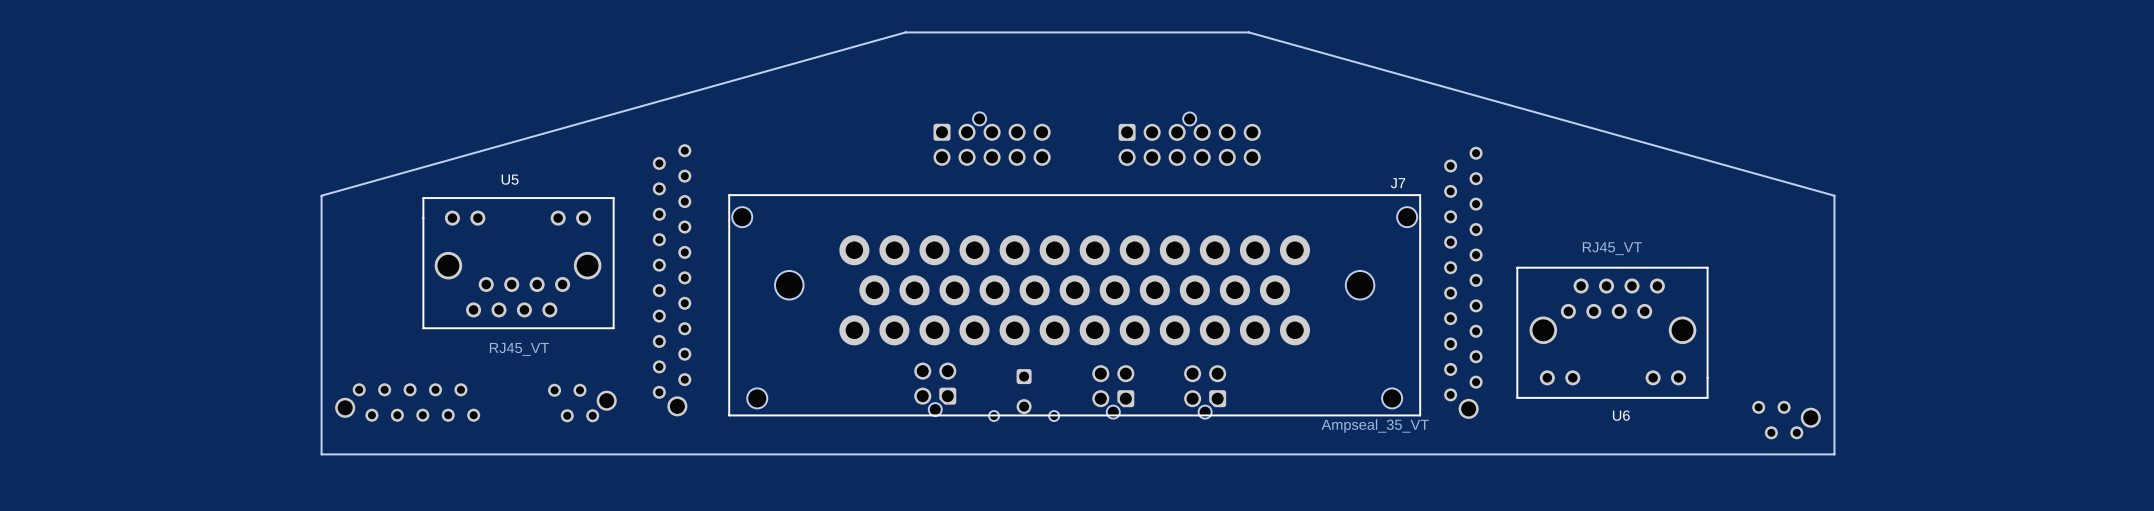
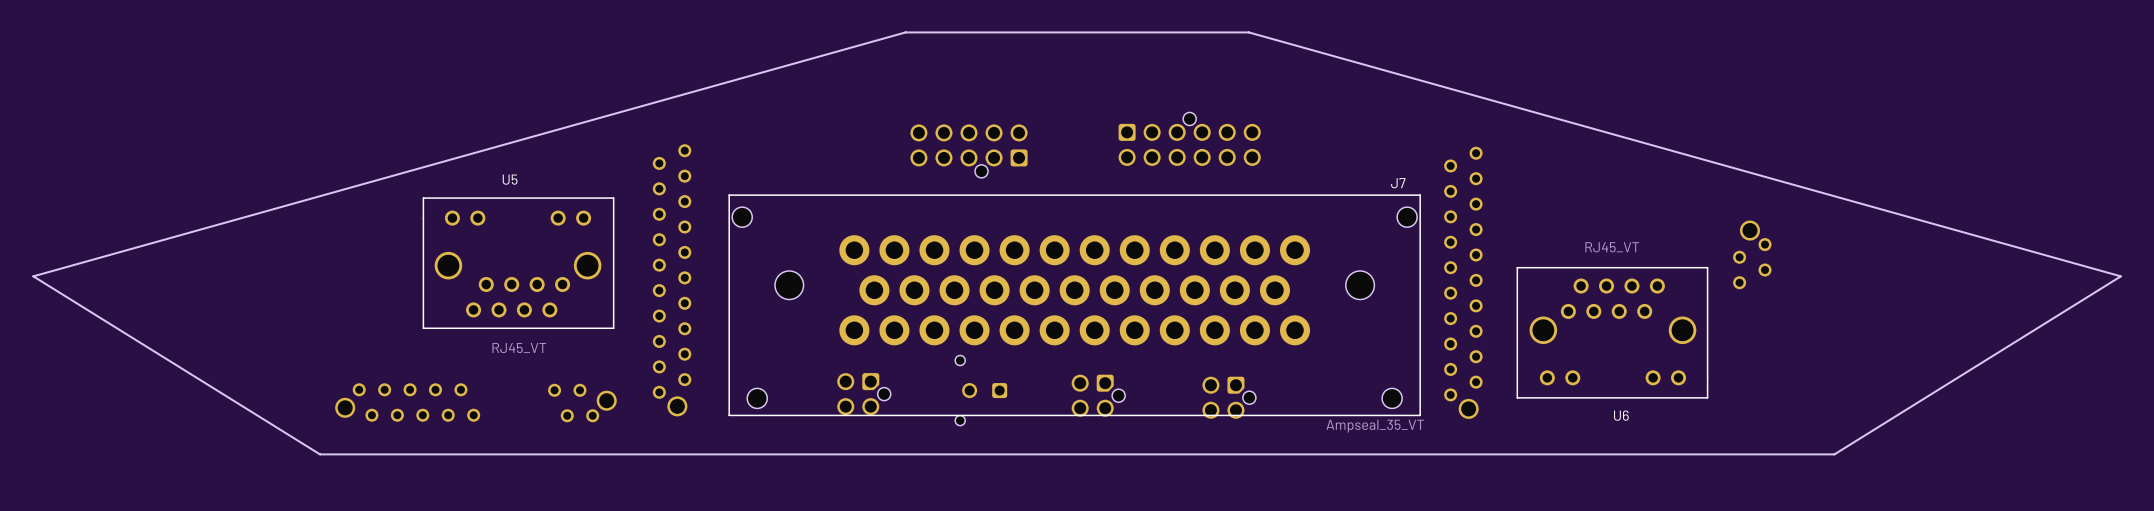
board edge: (905, 32) (321, 195) (321, 454) -> (905, 32) (33, 276) (321, 454)
board edge: (1248, 32) (1834, 195) (1834, 454) -> (1248, 32) (2120, 276) (1834, 454)
part rotation: 0° (992, 139) -> 180° (969, 151)
part rotation: 0° (935, 389) -> 90° counterclockwise (863, 394)
part position: (935, 389) -> (863, 394)
part rotation: 0° (1113, 391) -> 90° counterclockwise (1098, 395)
part rotation: 0° (1205, 391) -> 90° counterclockwise (1229, 397)
part rotation: 0° (1024, 395) -> 90° clockwise (981, 390)
part position: (1024, 395) -> (981, 390)
part rotation: 0° (1786, 420) -> 90° counterclockwise (1752, 254)
part position: (1786, 420) -> (1752, 254)

